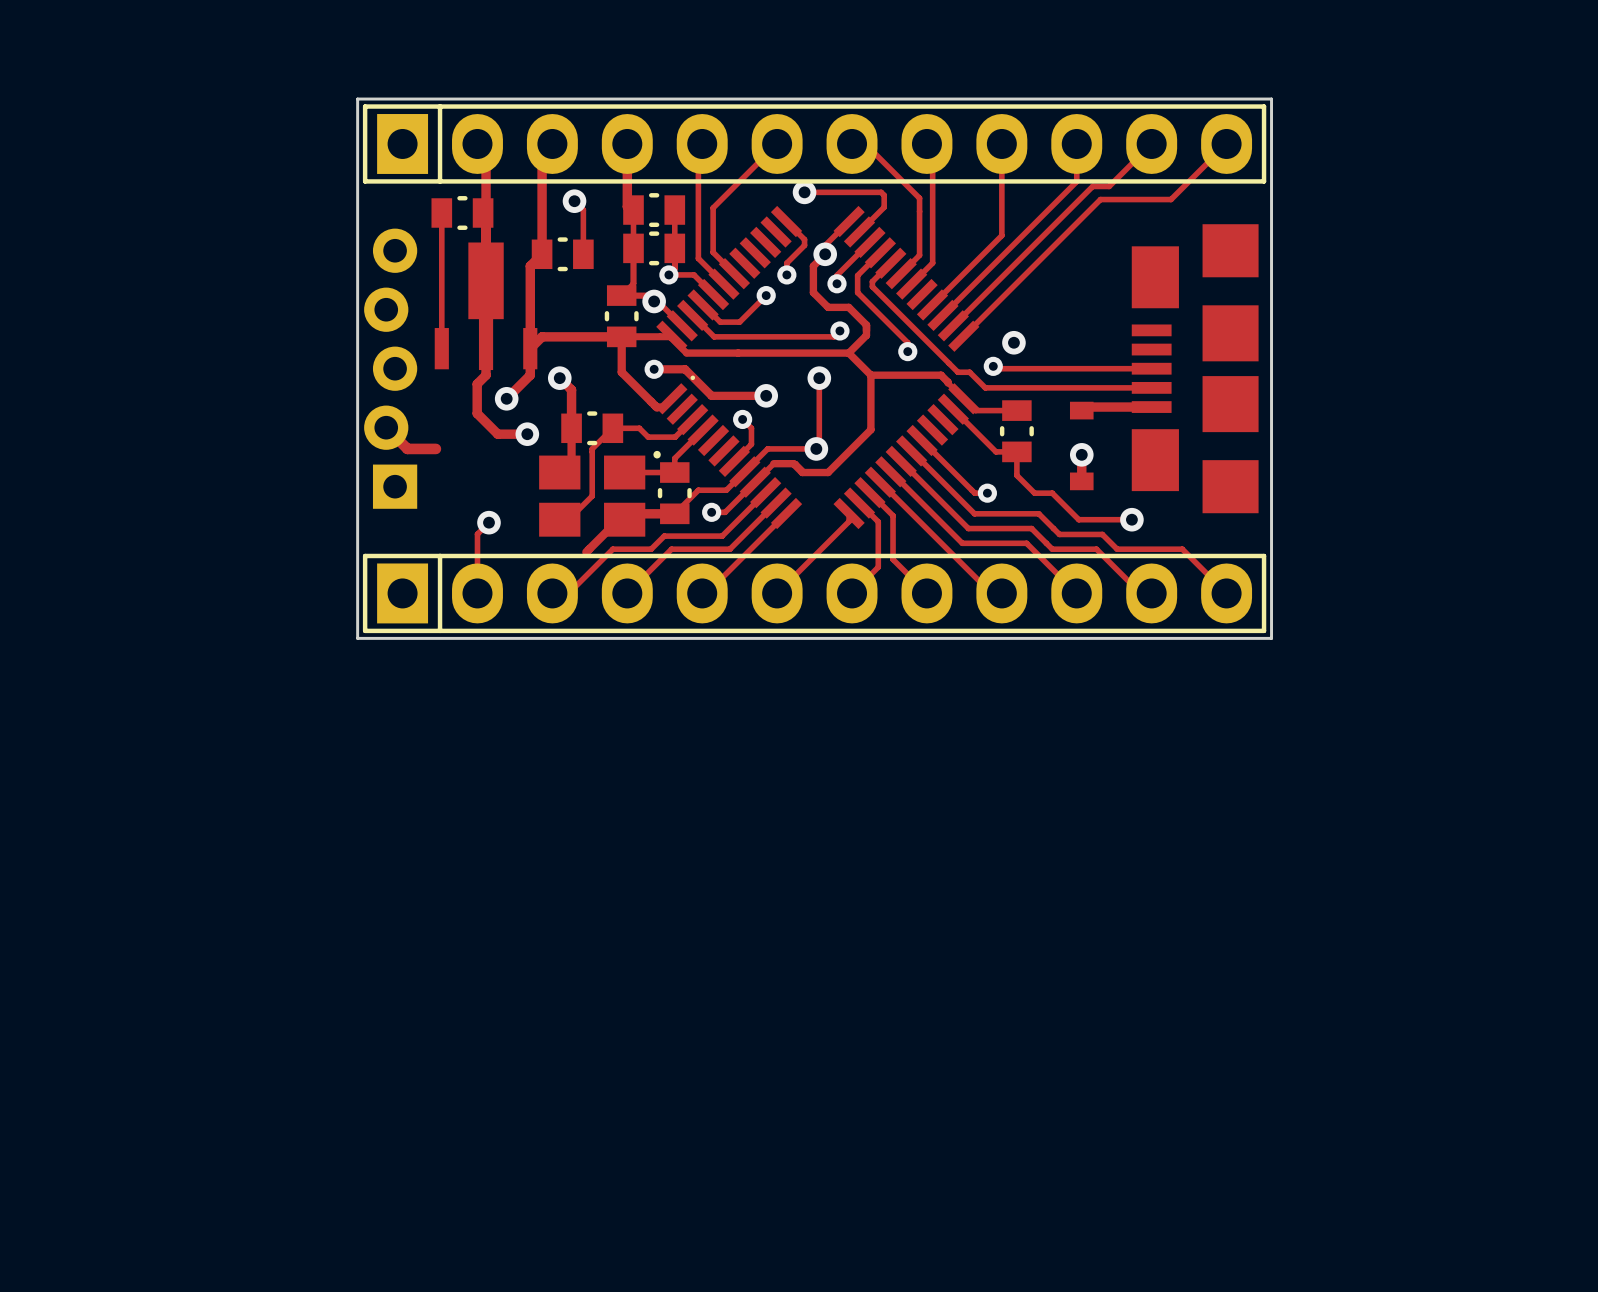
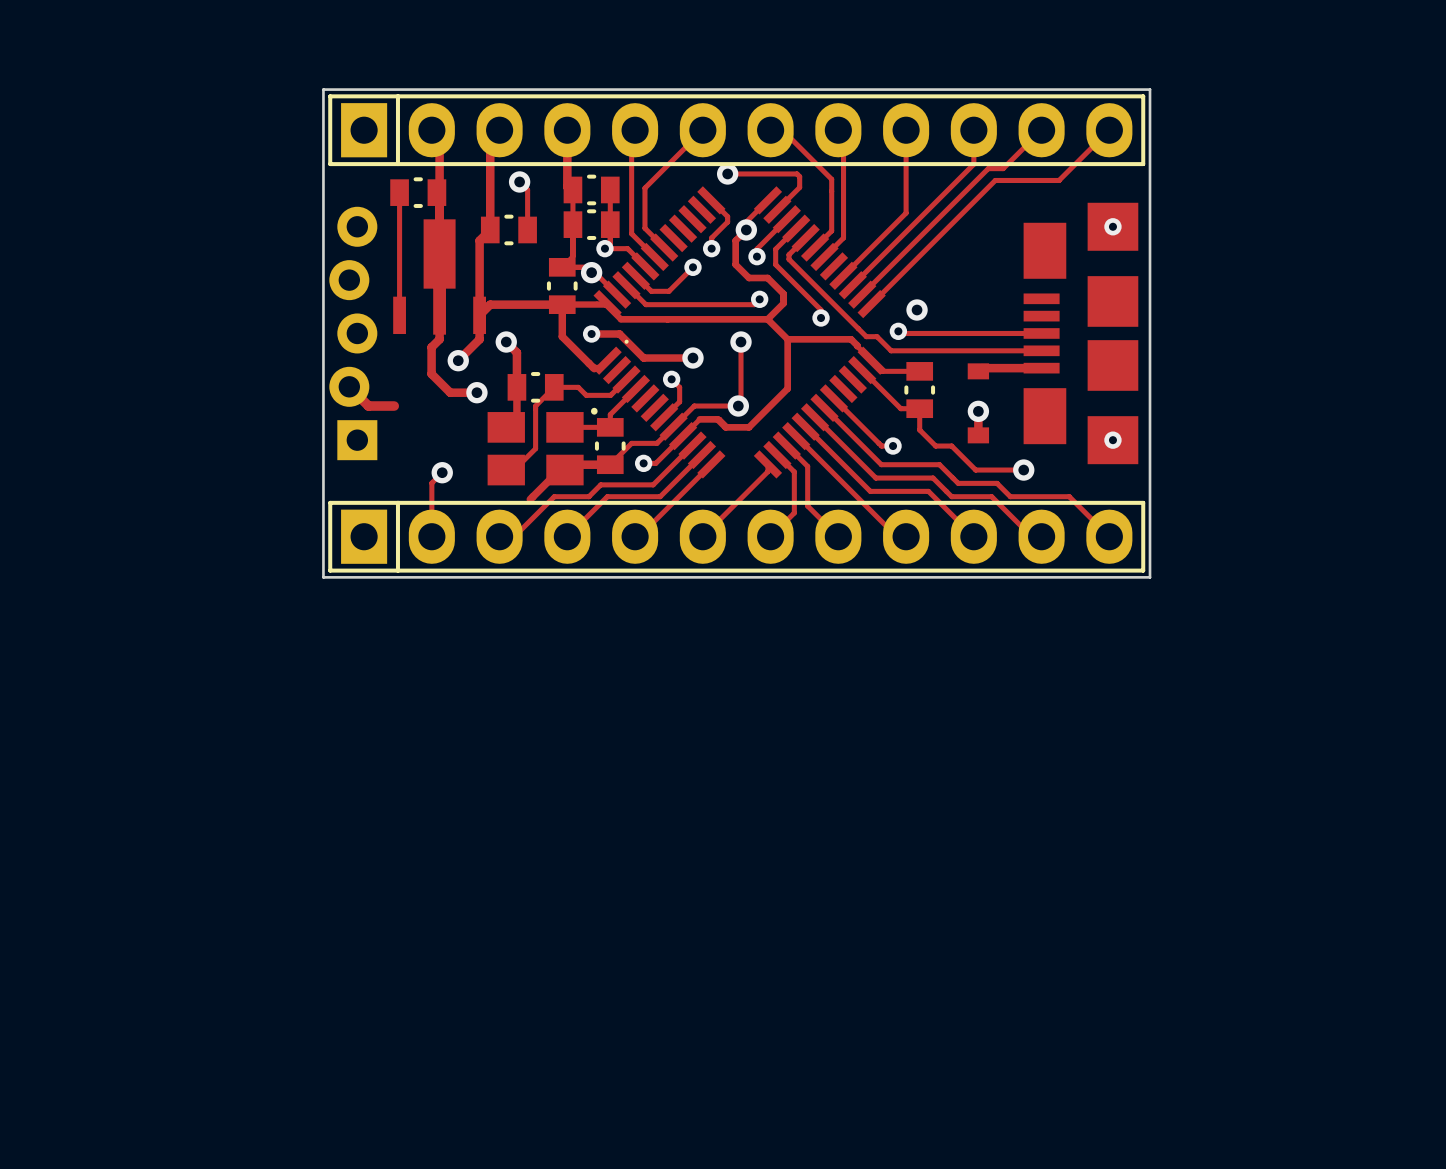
via: none -> (1112, 226)
via: none -> (1112, 440)

